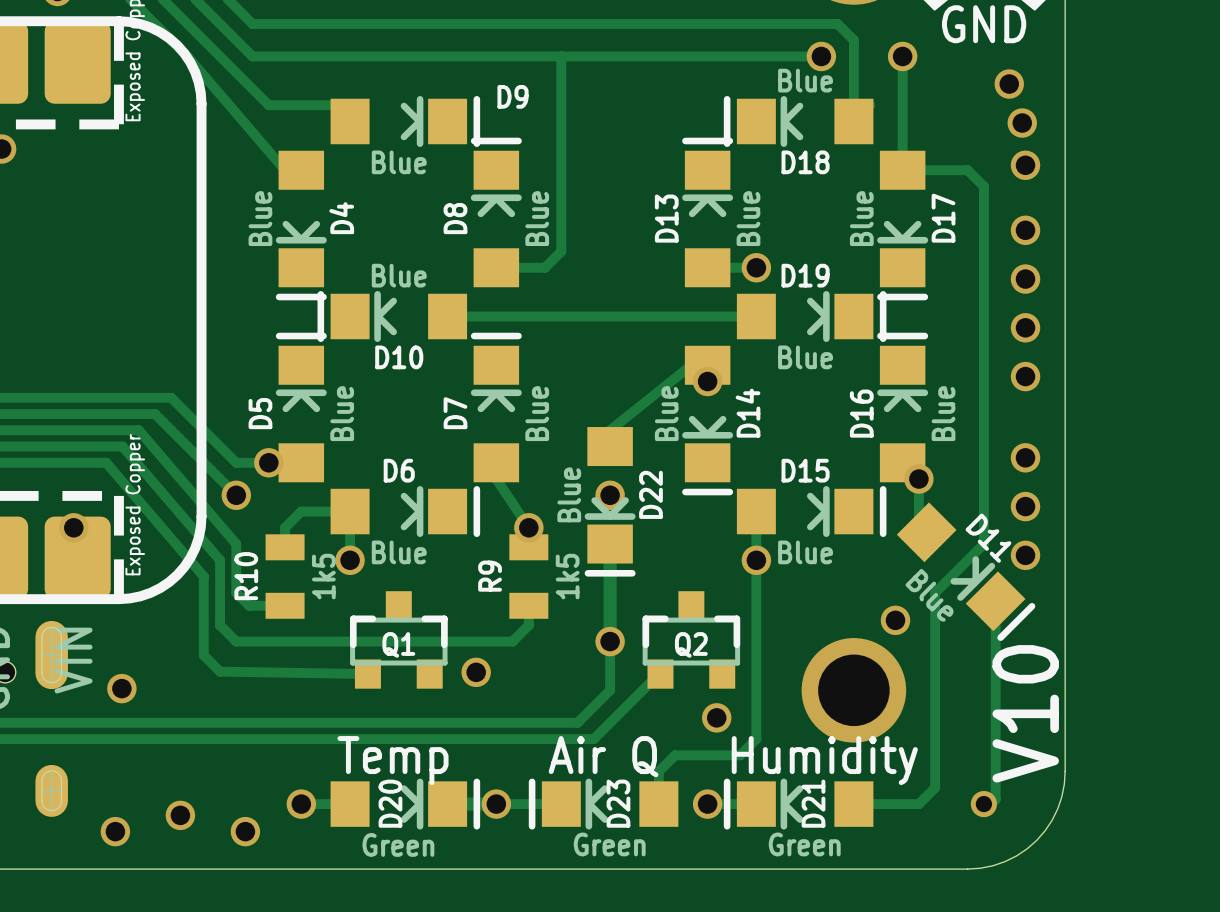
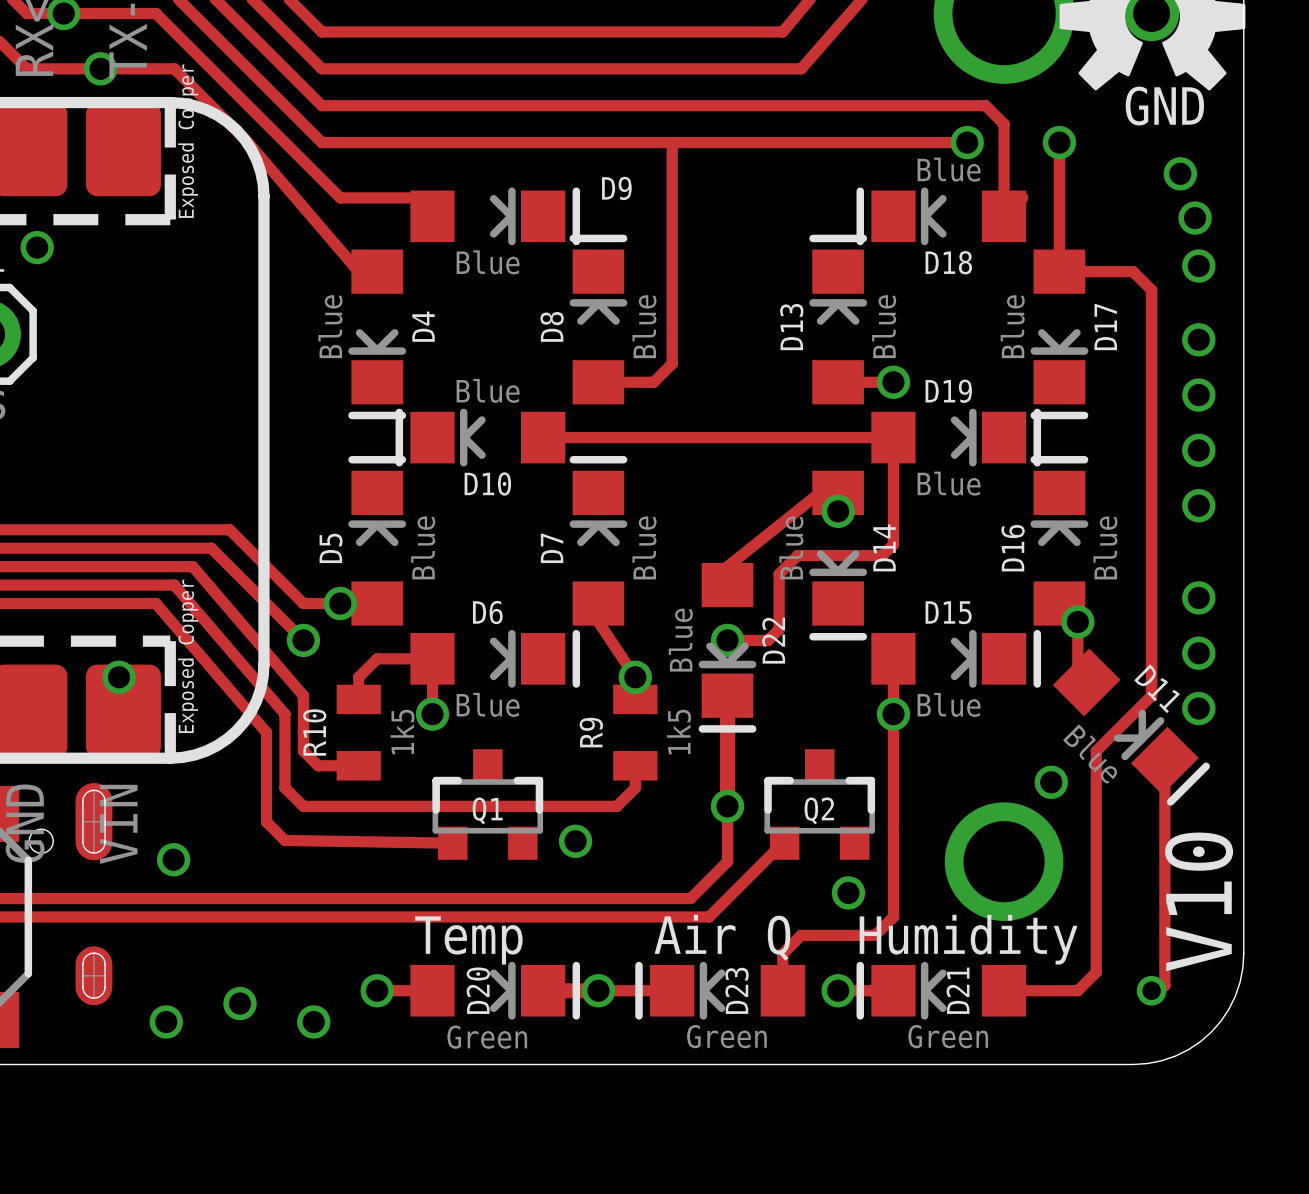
track: none -> (893, 437) (893, 544) (882, 555) (797, 555) (779, 574) (779, 629) (768, 640) (727, 640)

